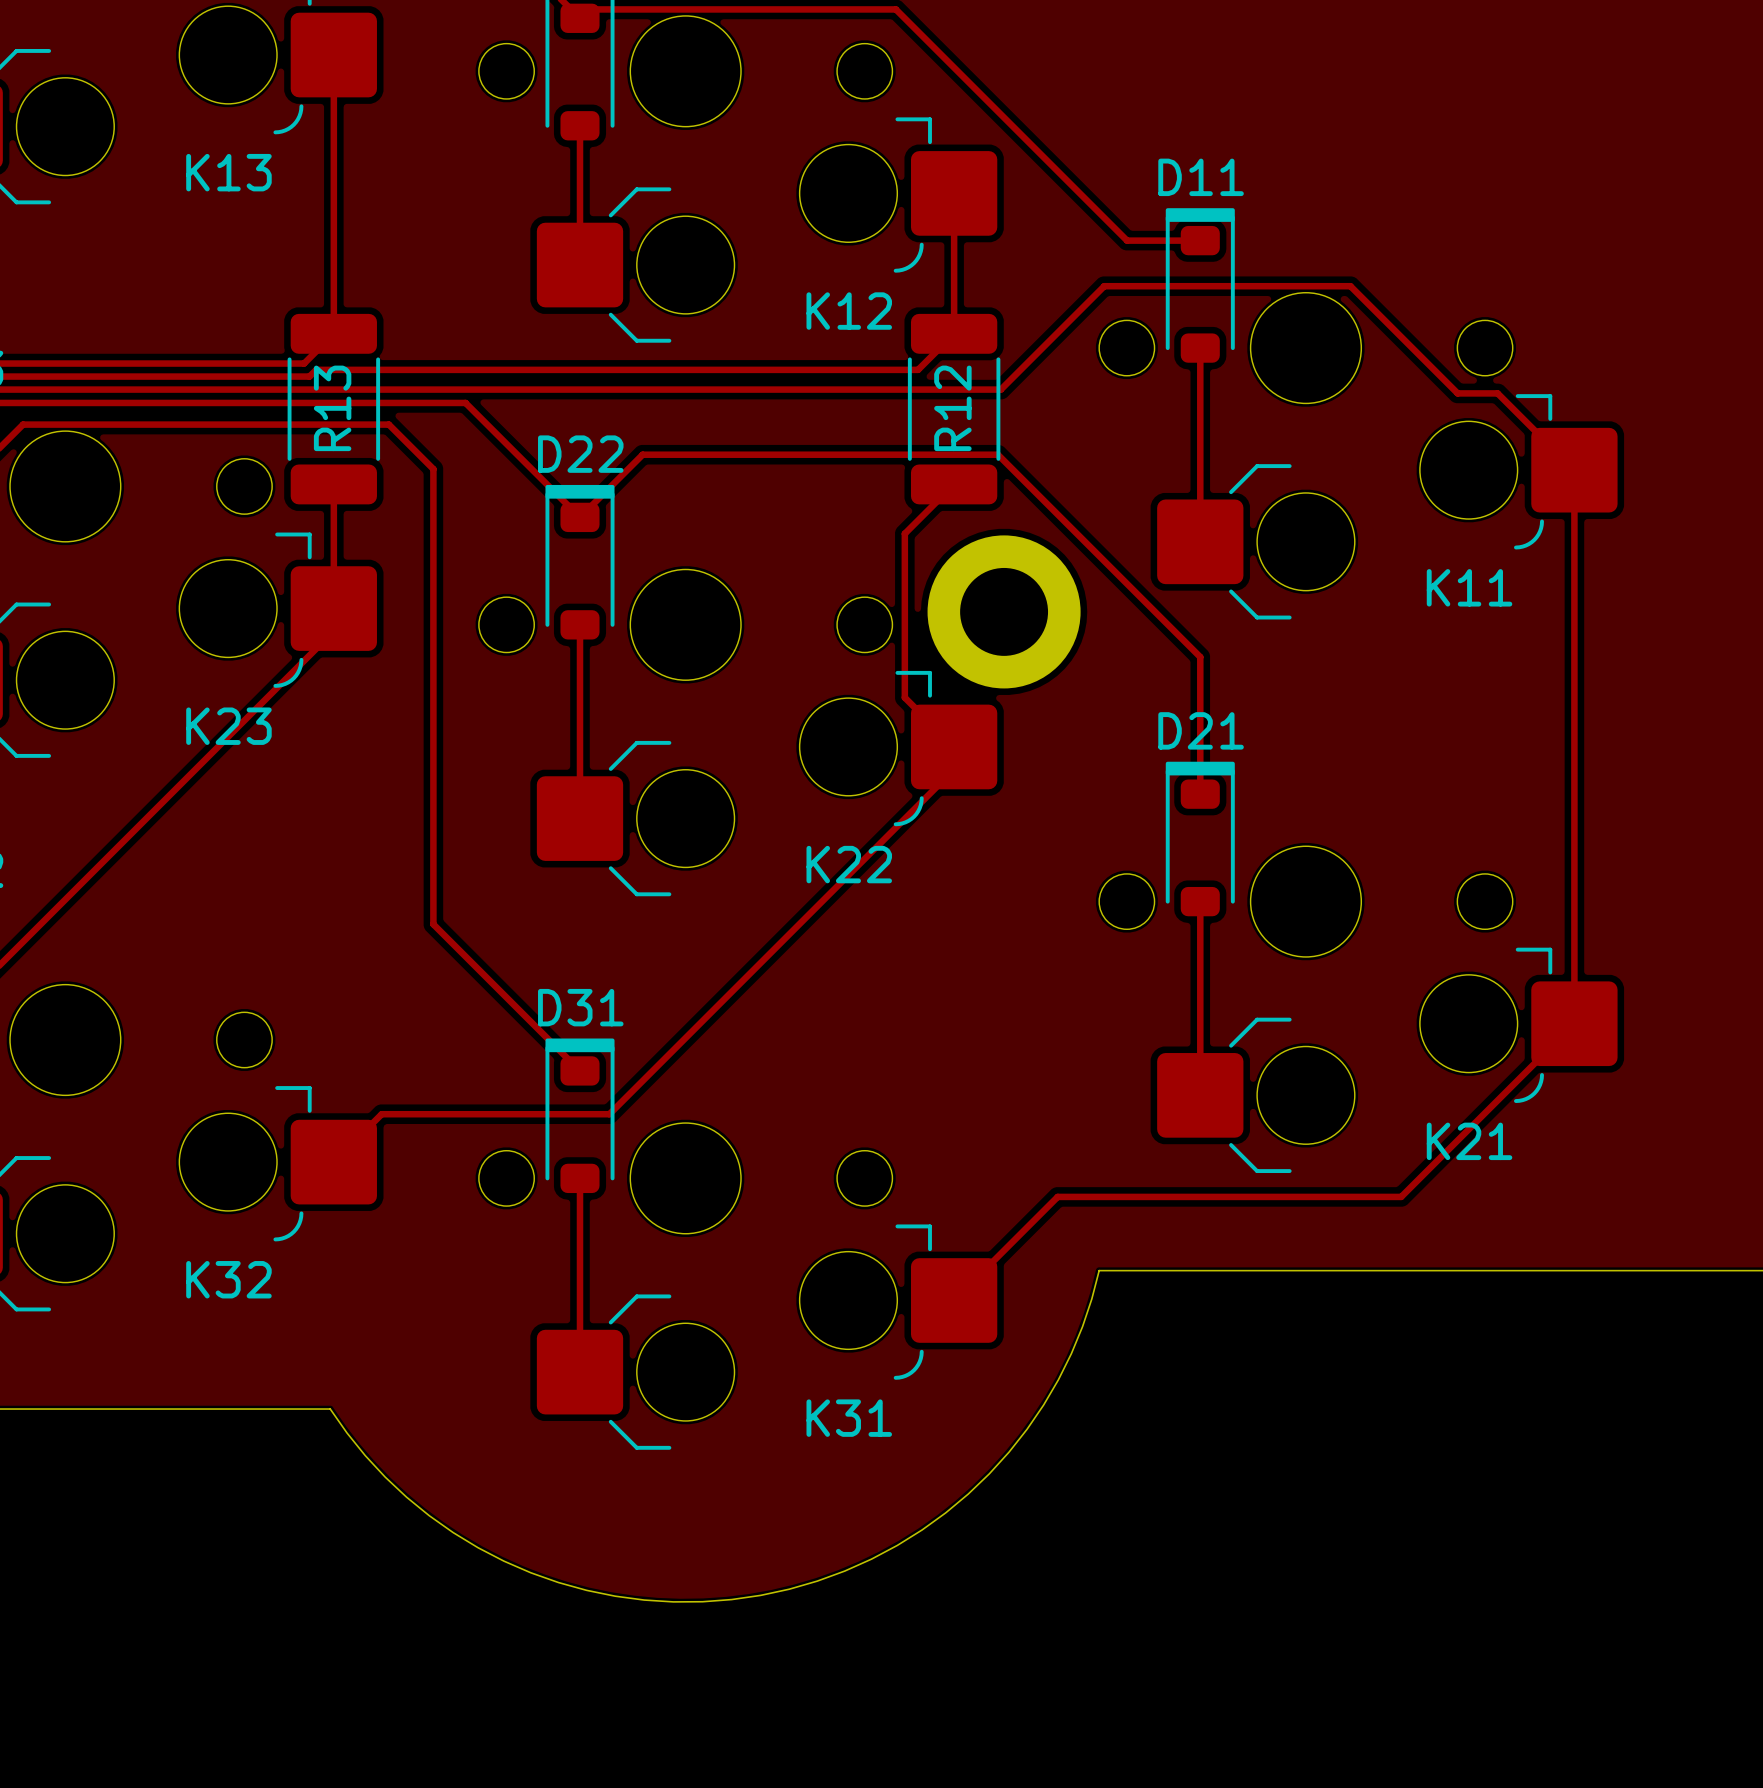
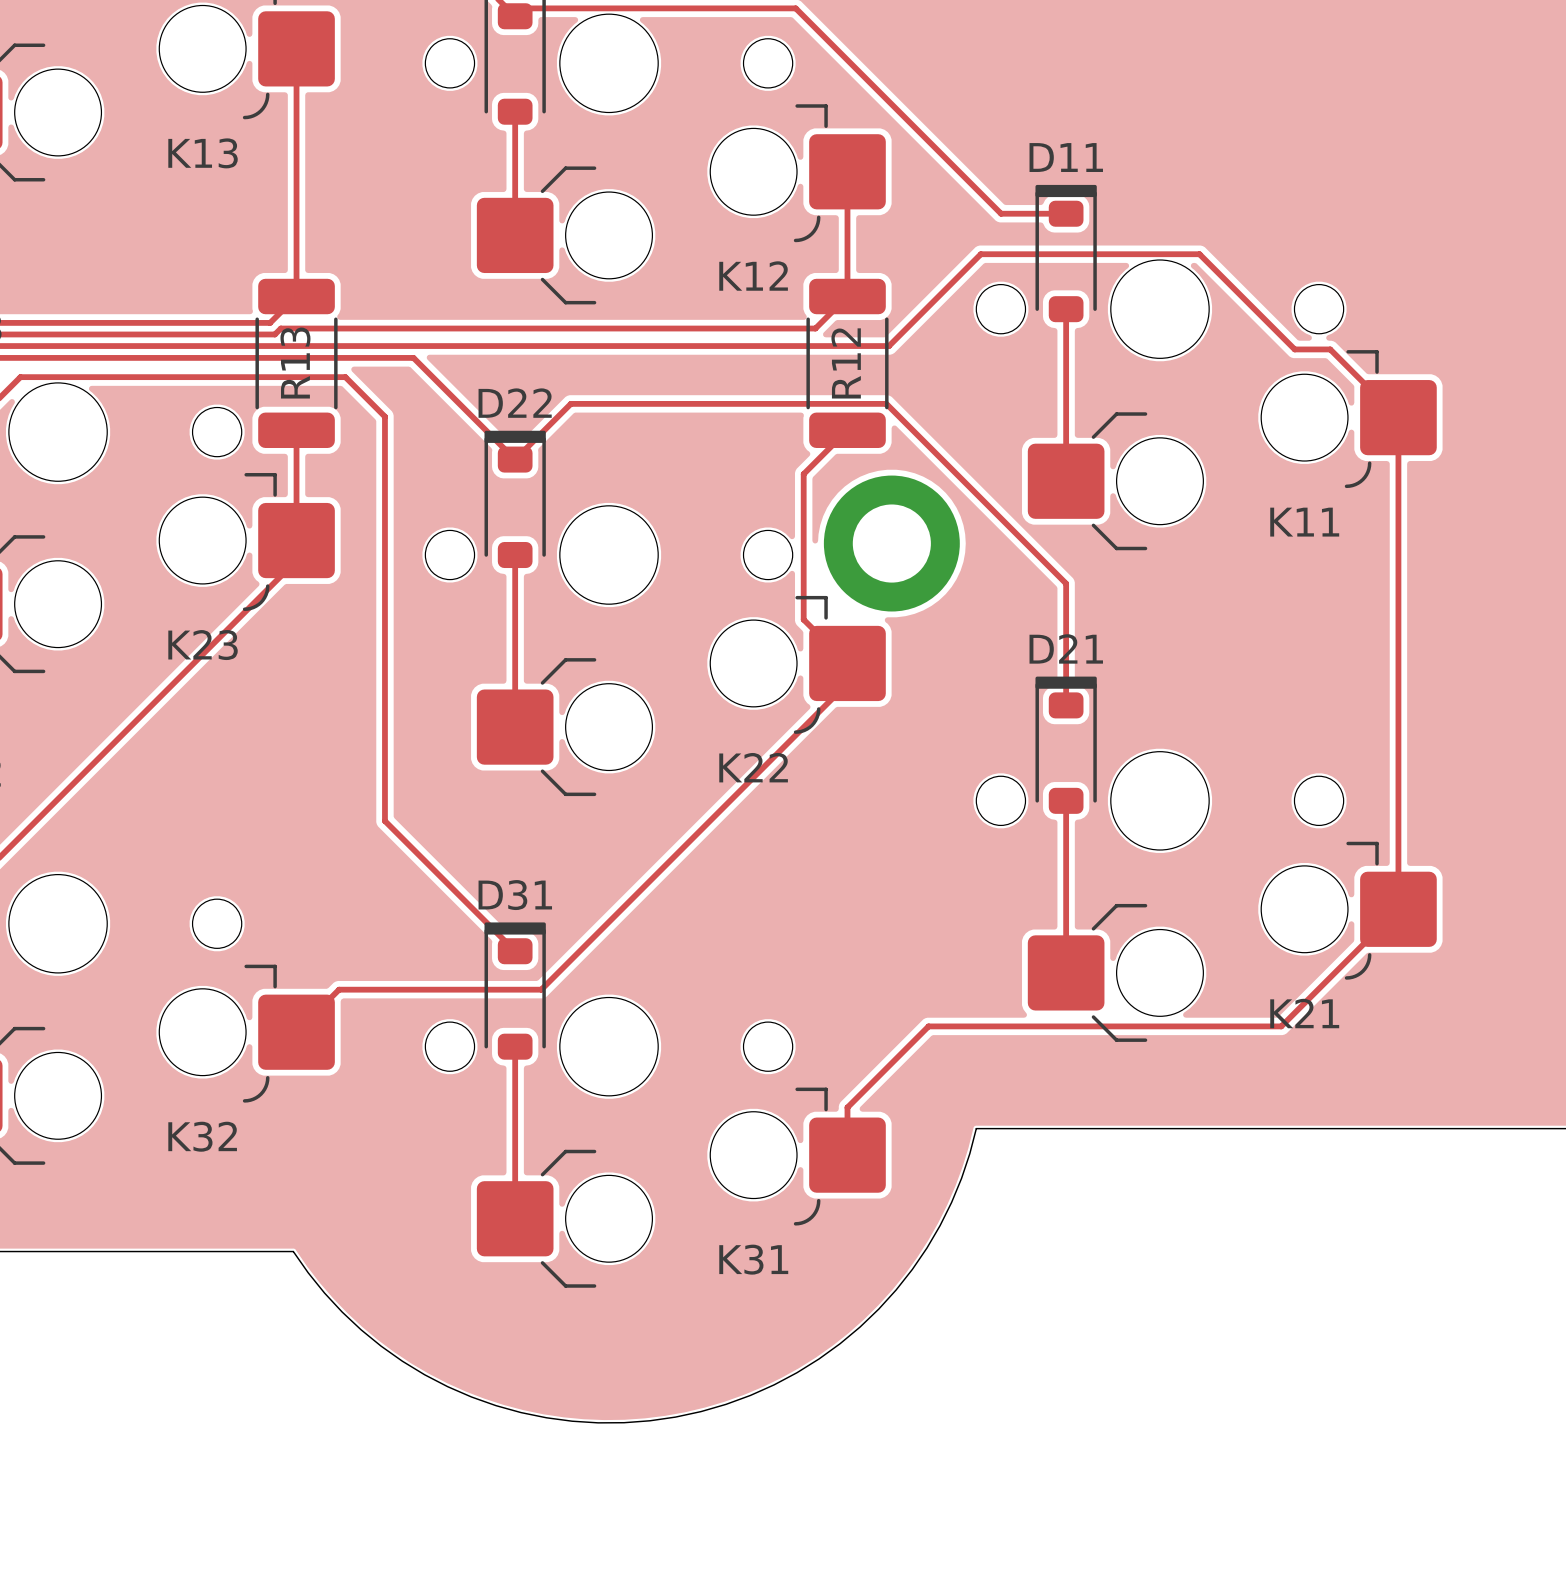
top track: (1442, 1155) (1401, 1196) (1057, 1196) (954, 1300) -> (1281, 1026) (928, 1026) (847, 1107) (847, 1155)

